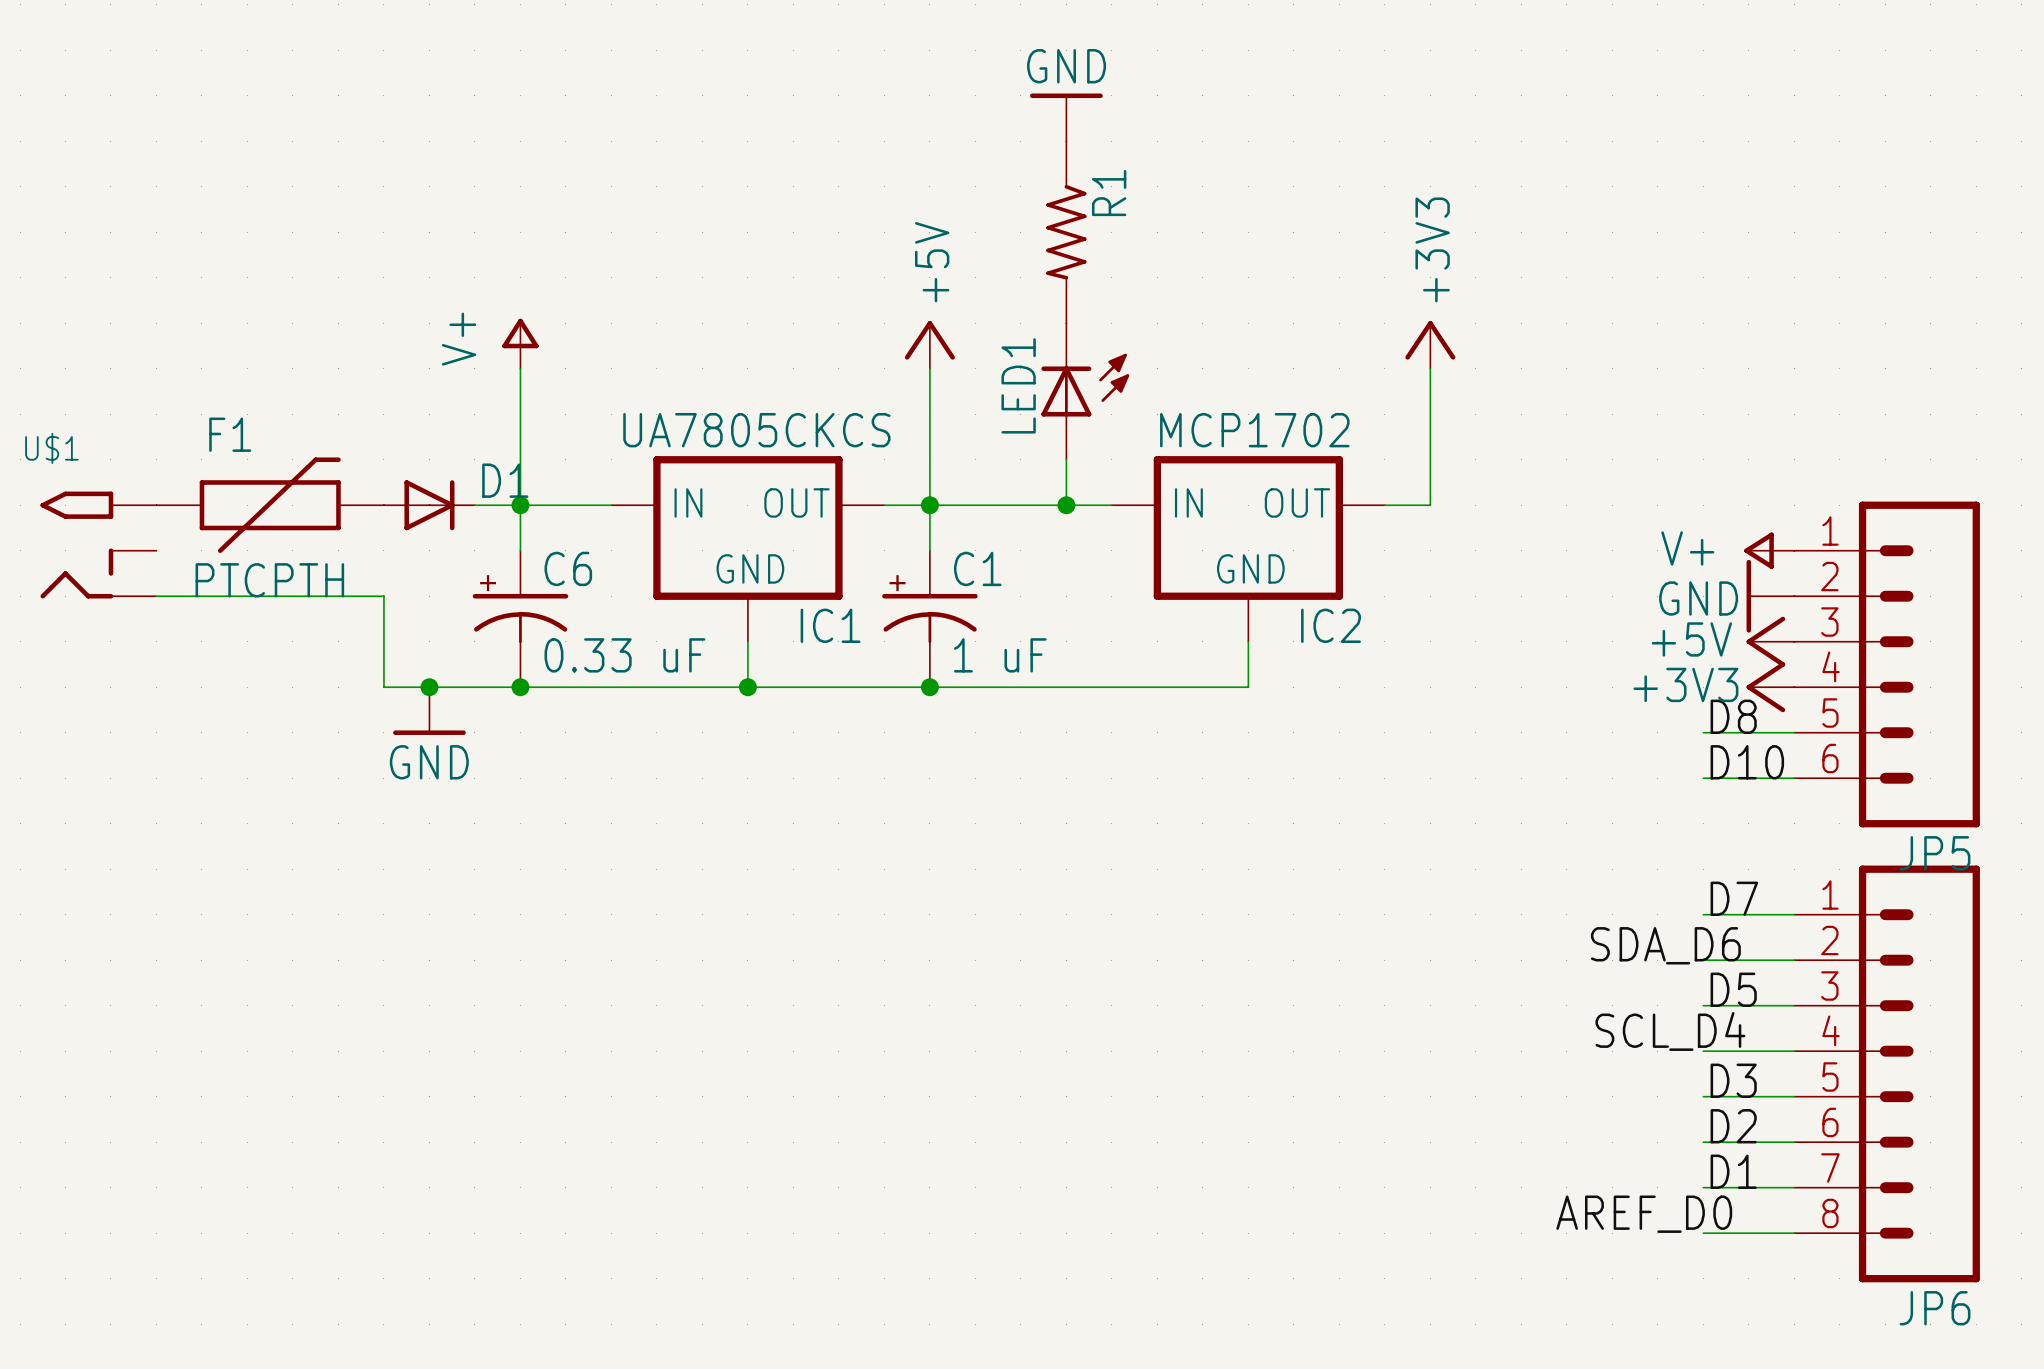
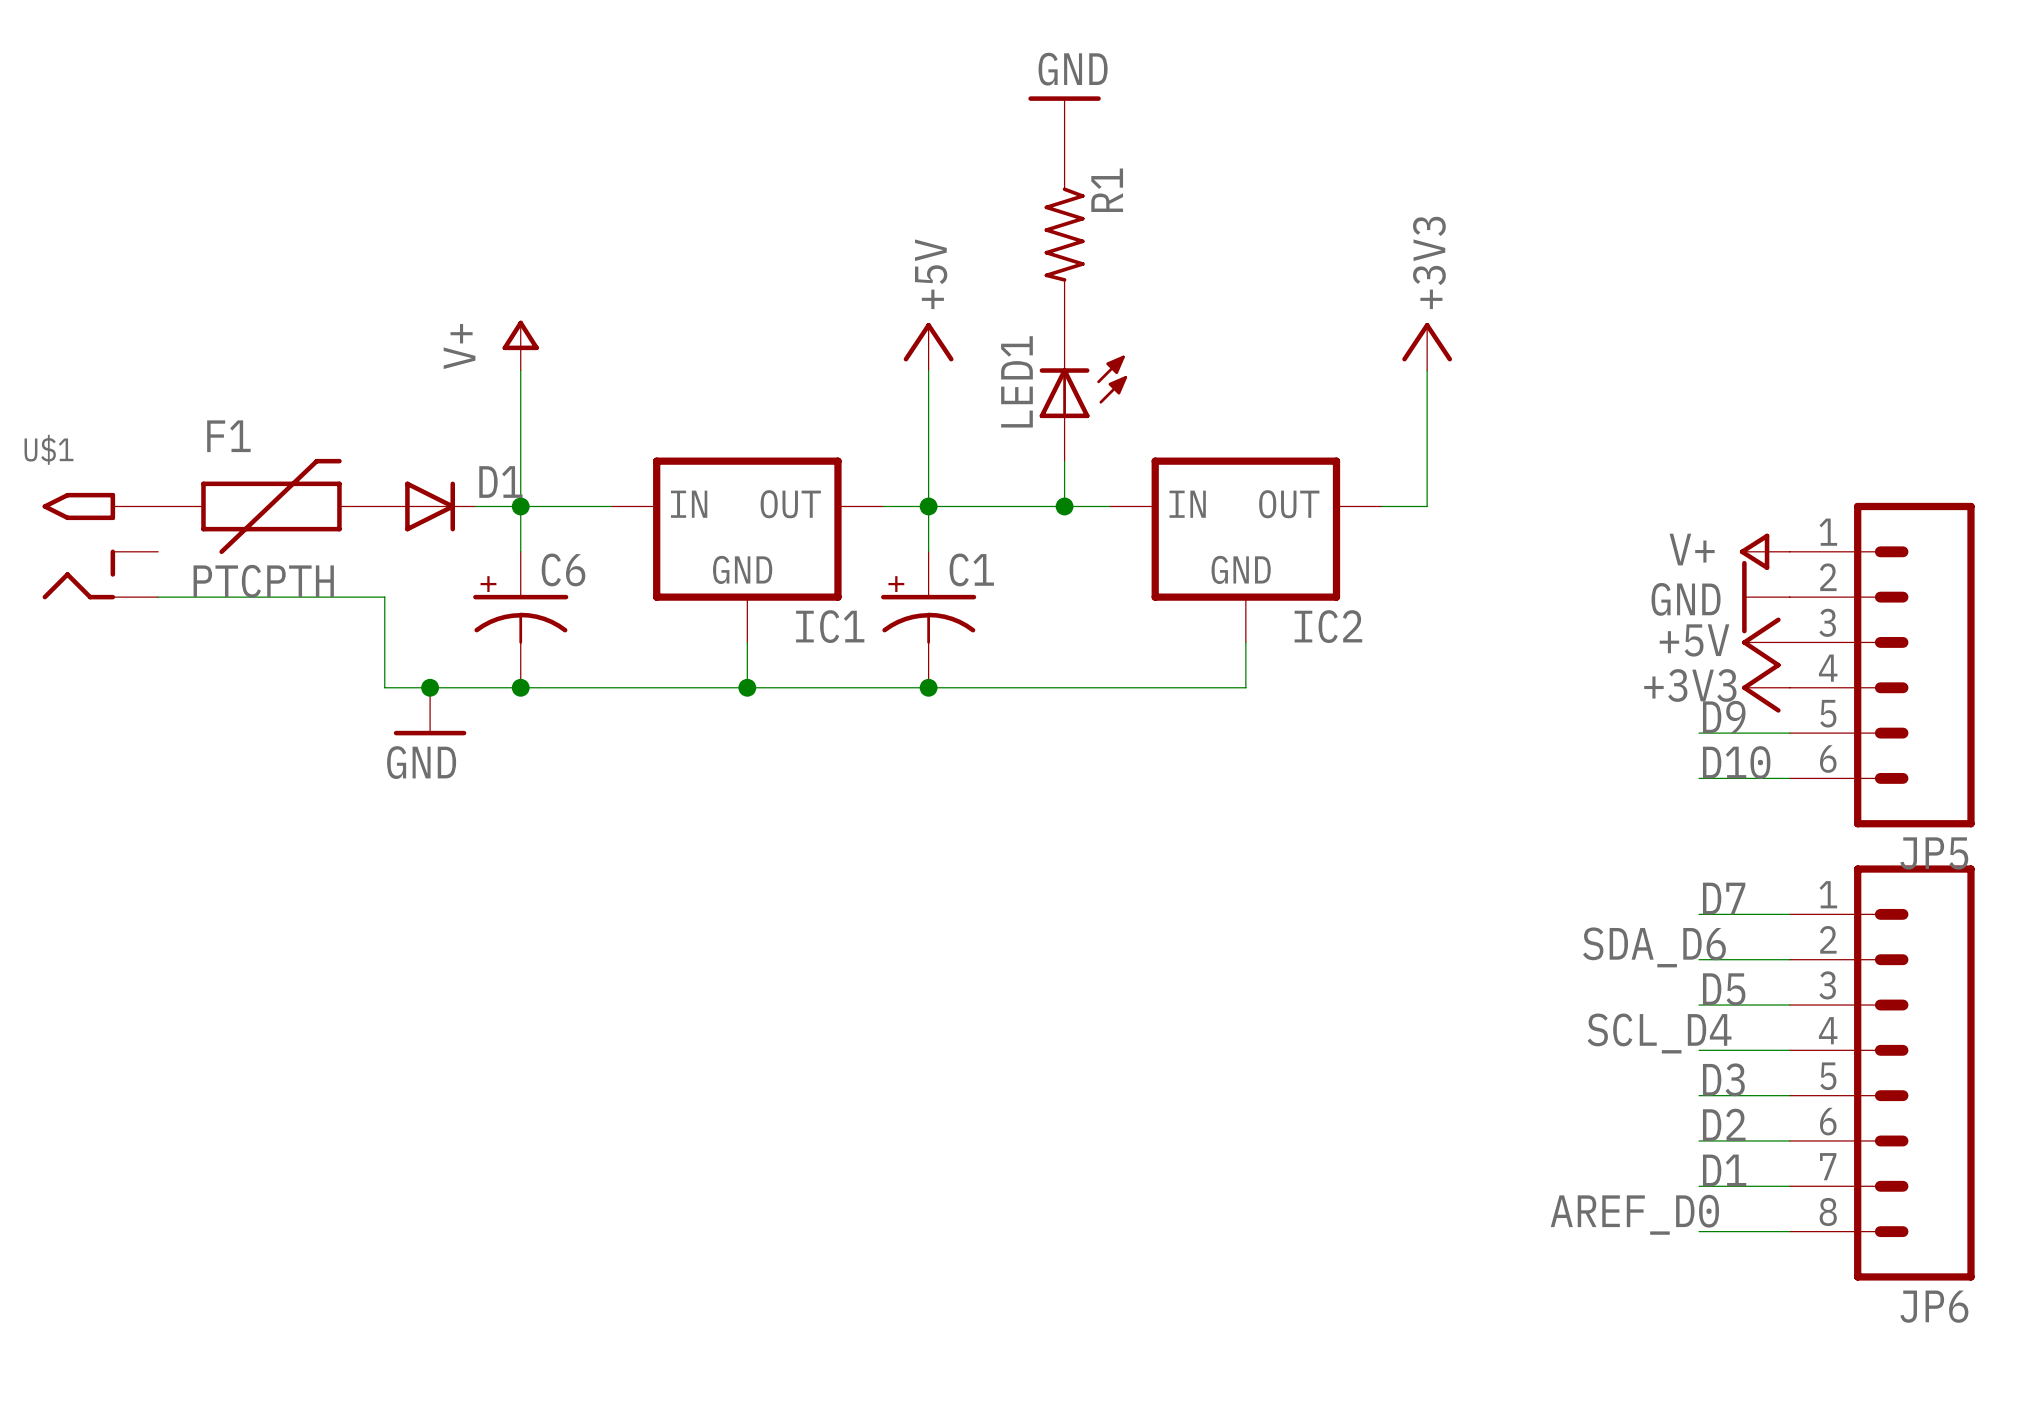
IC1 value: UA7805CKCS (756, 430) -> none
IC2 value: MCP1702 (1254, 430) -> none
C6 value: 0.33 uF (624, 655) -> none
C1 value: 1 uF (1000, 655) -> none
label: D8 (1733, 716) -> D9 (1724, 716)

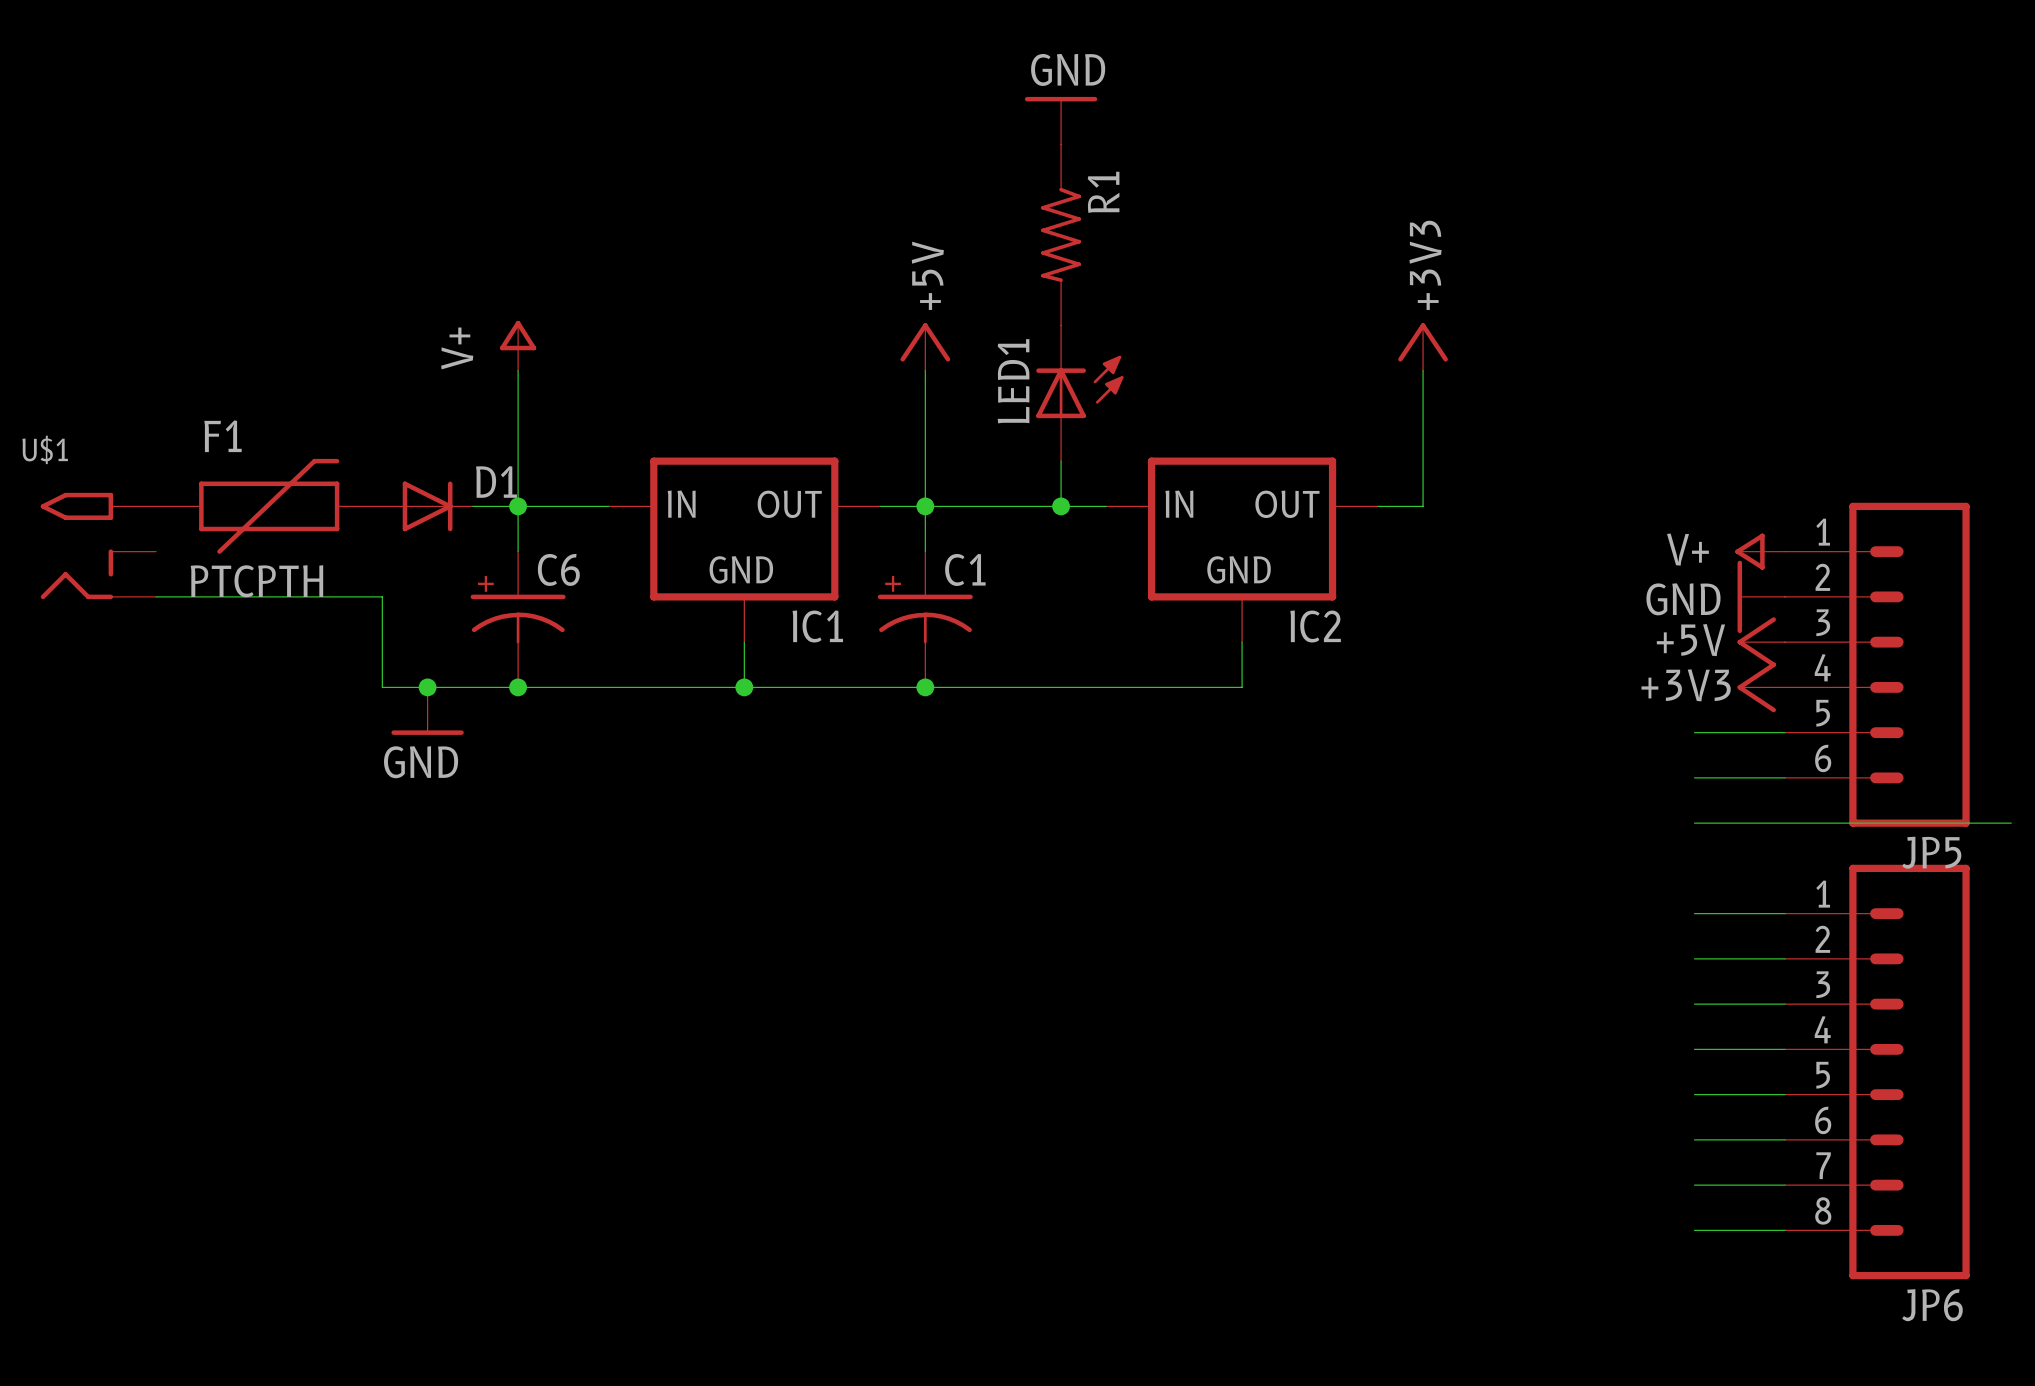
label: D9 (1724, 716) -> none
label: D10 (1736, 762) -> none
wire: none -> (1694, 823) (2011, 823)
label: D7 (1724, 898) -> none
label: SDA_D6 (1654, 947) -> none
label: D5 (1724, 989) -> none
label: SCL_D4 (1659, 1033) -> none
label: D3 (1723, 1079) -> none
label: D2 (1724, 1124) -> none
label: D1 (1724, 1170) -> none
label: AREF_D0 (1634, 1214) -> none

